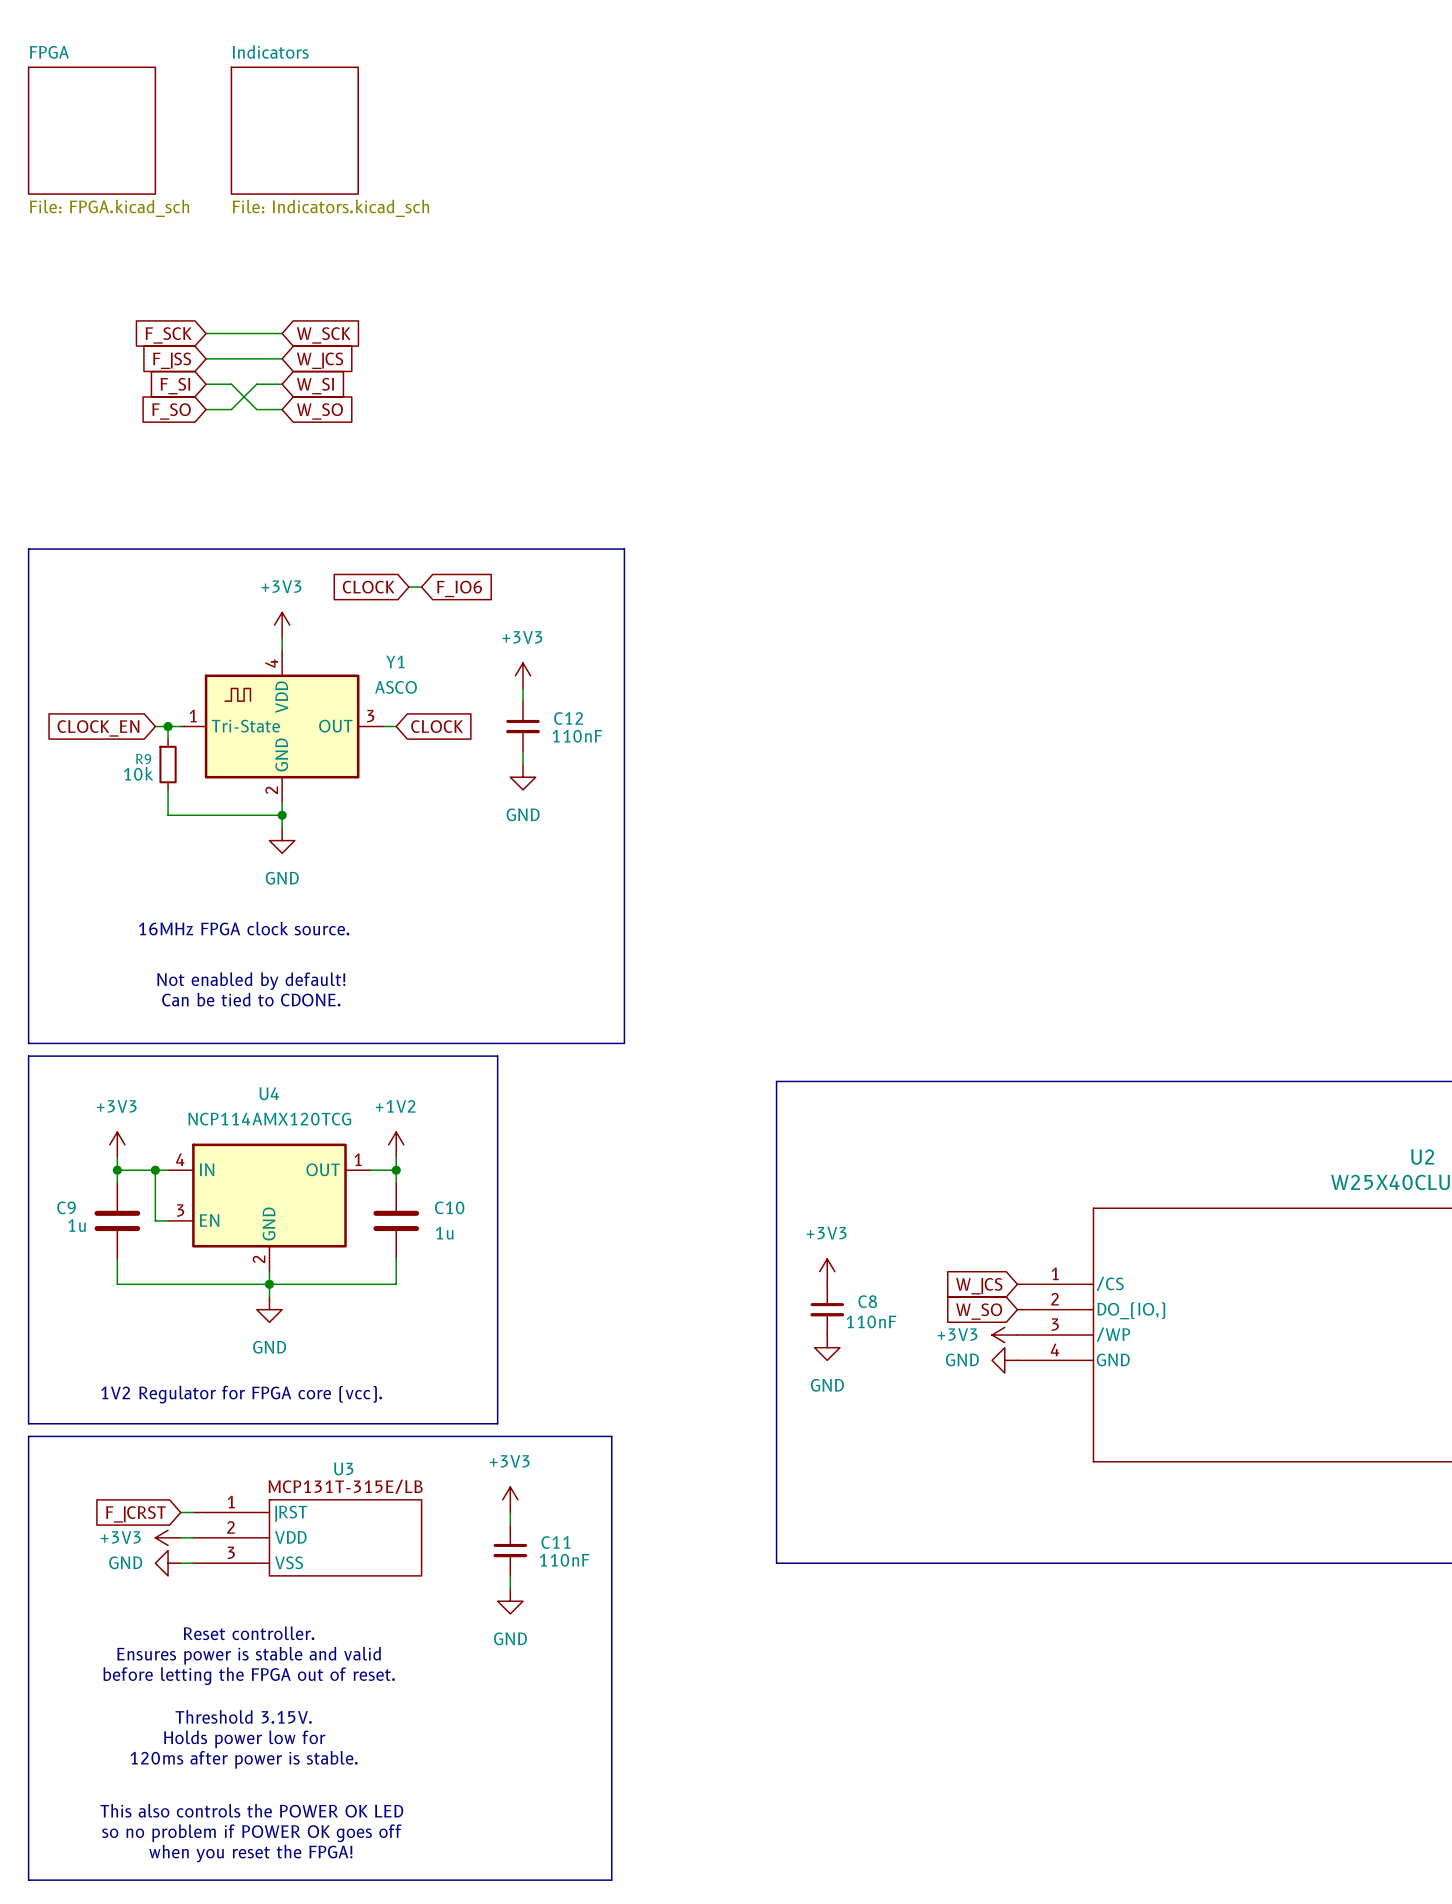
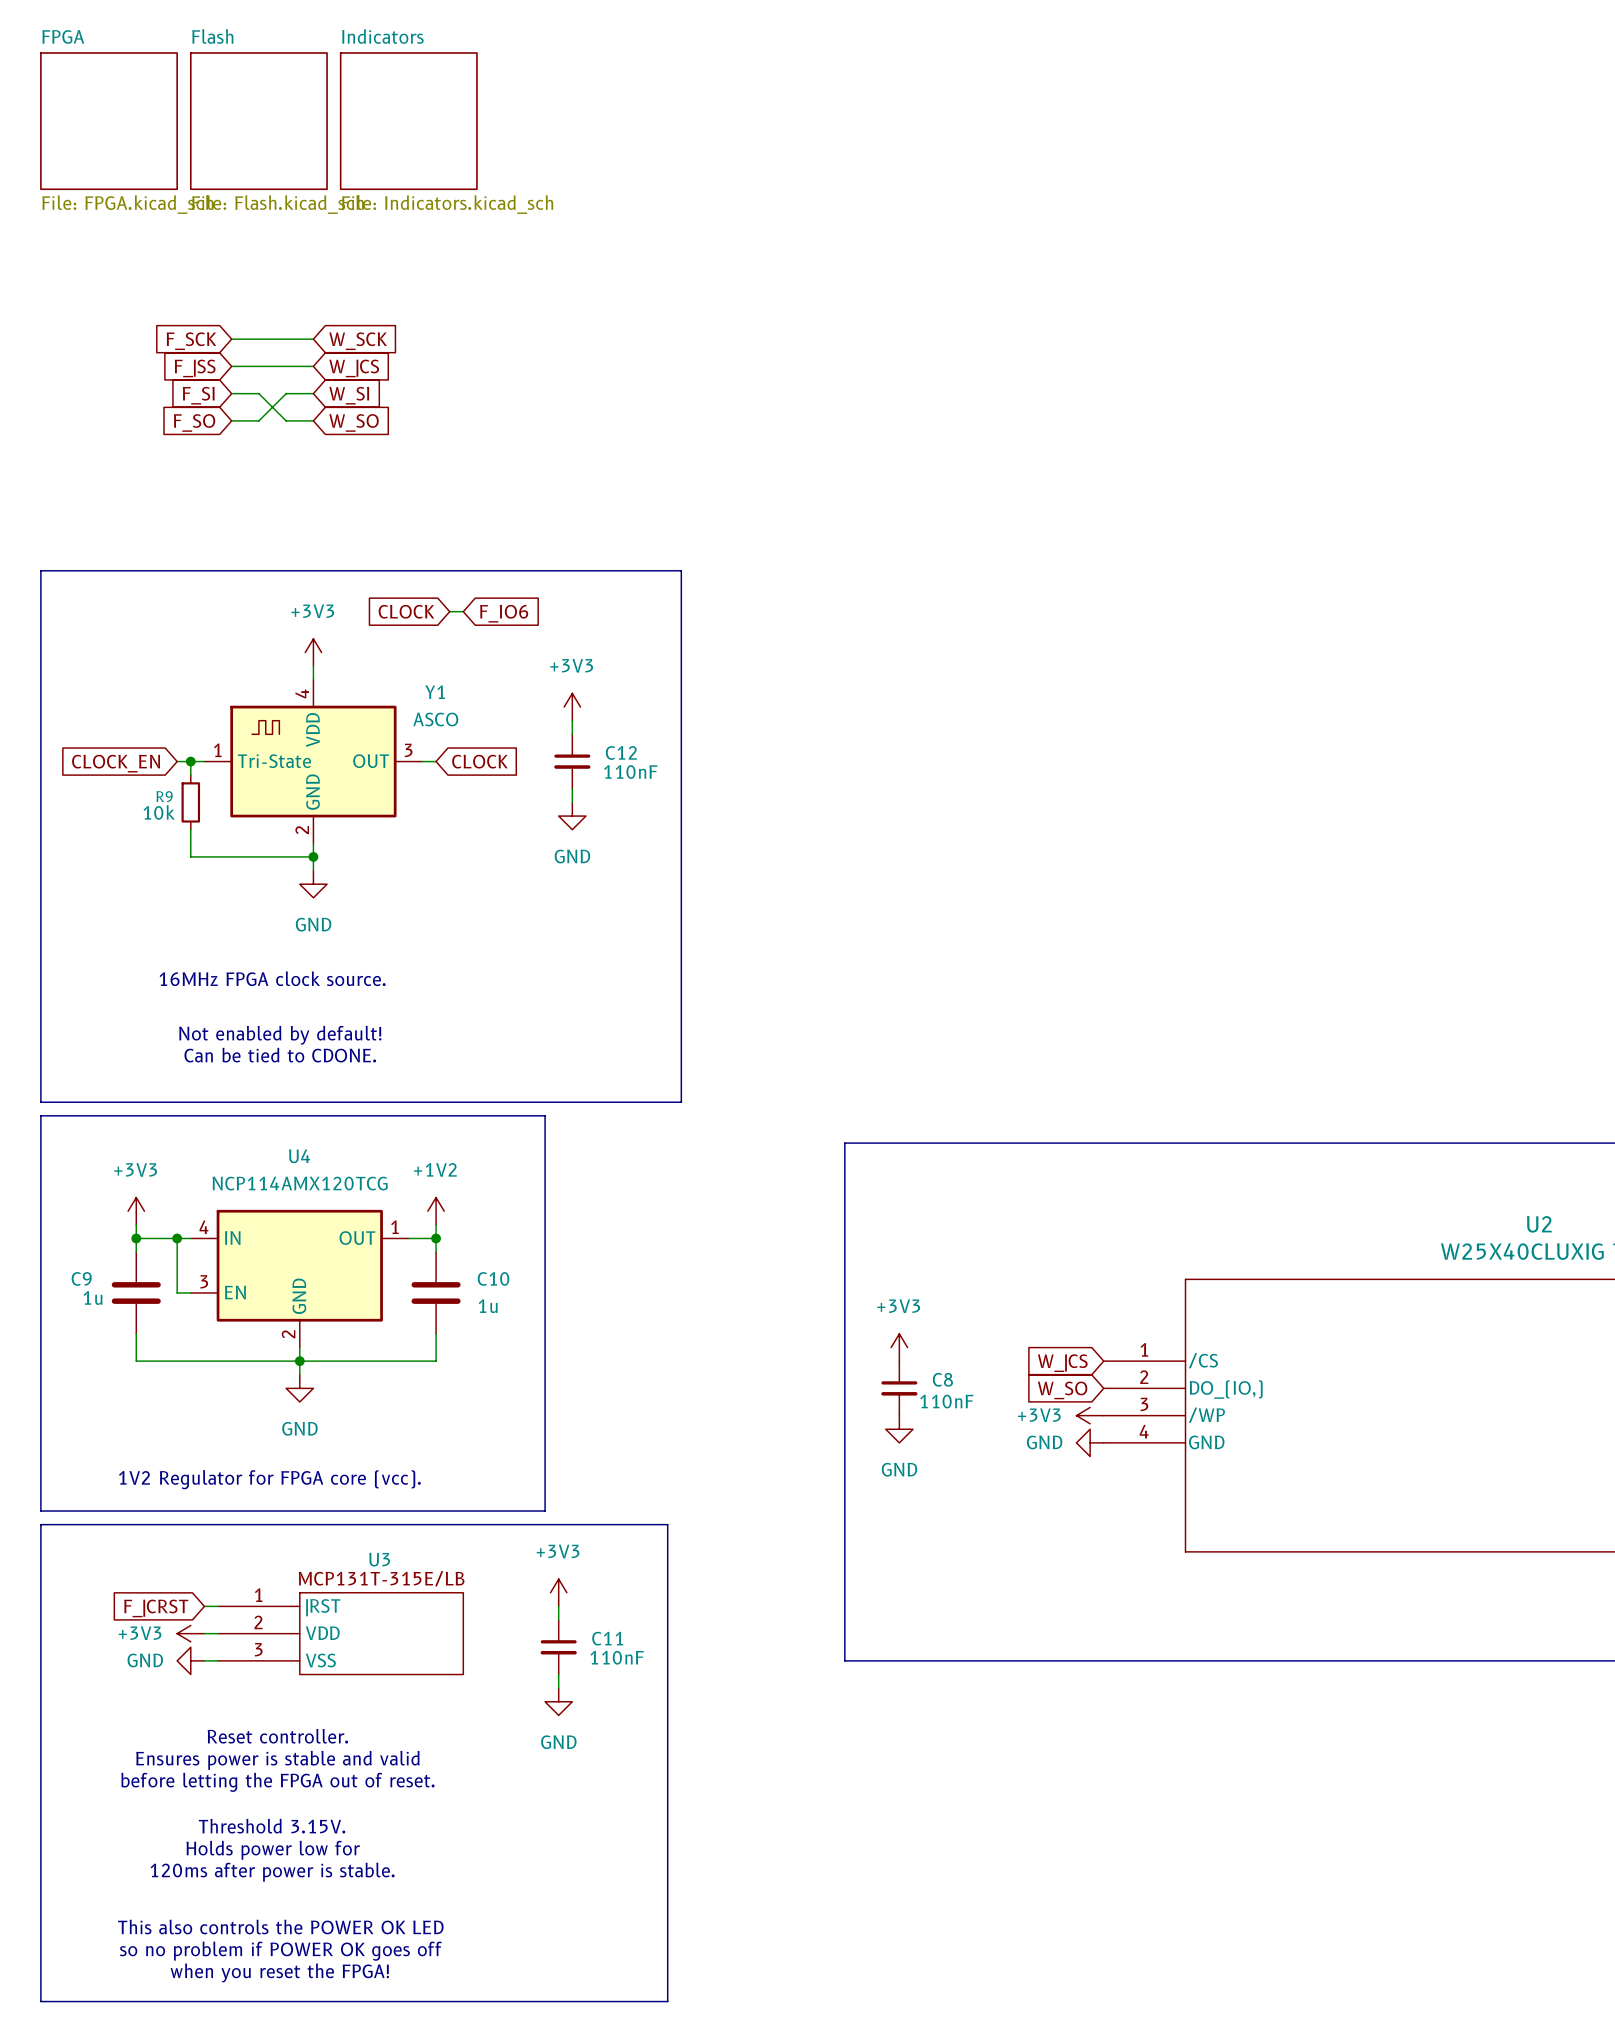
sheet Flash: none -> File: Flash.kicad_sch (258, 121)
sheet Indicators position: (294, 130) -> (408, 121)

